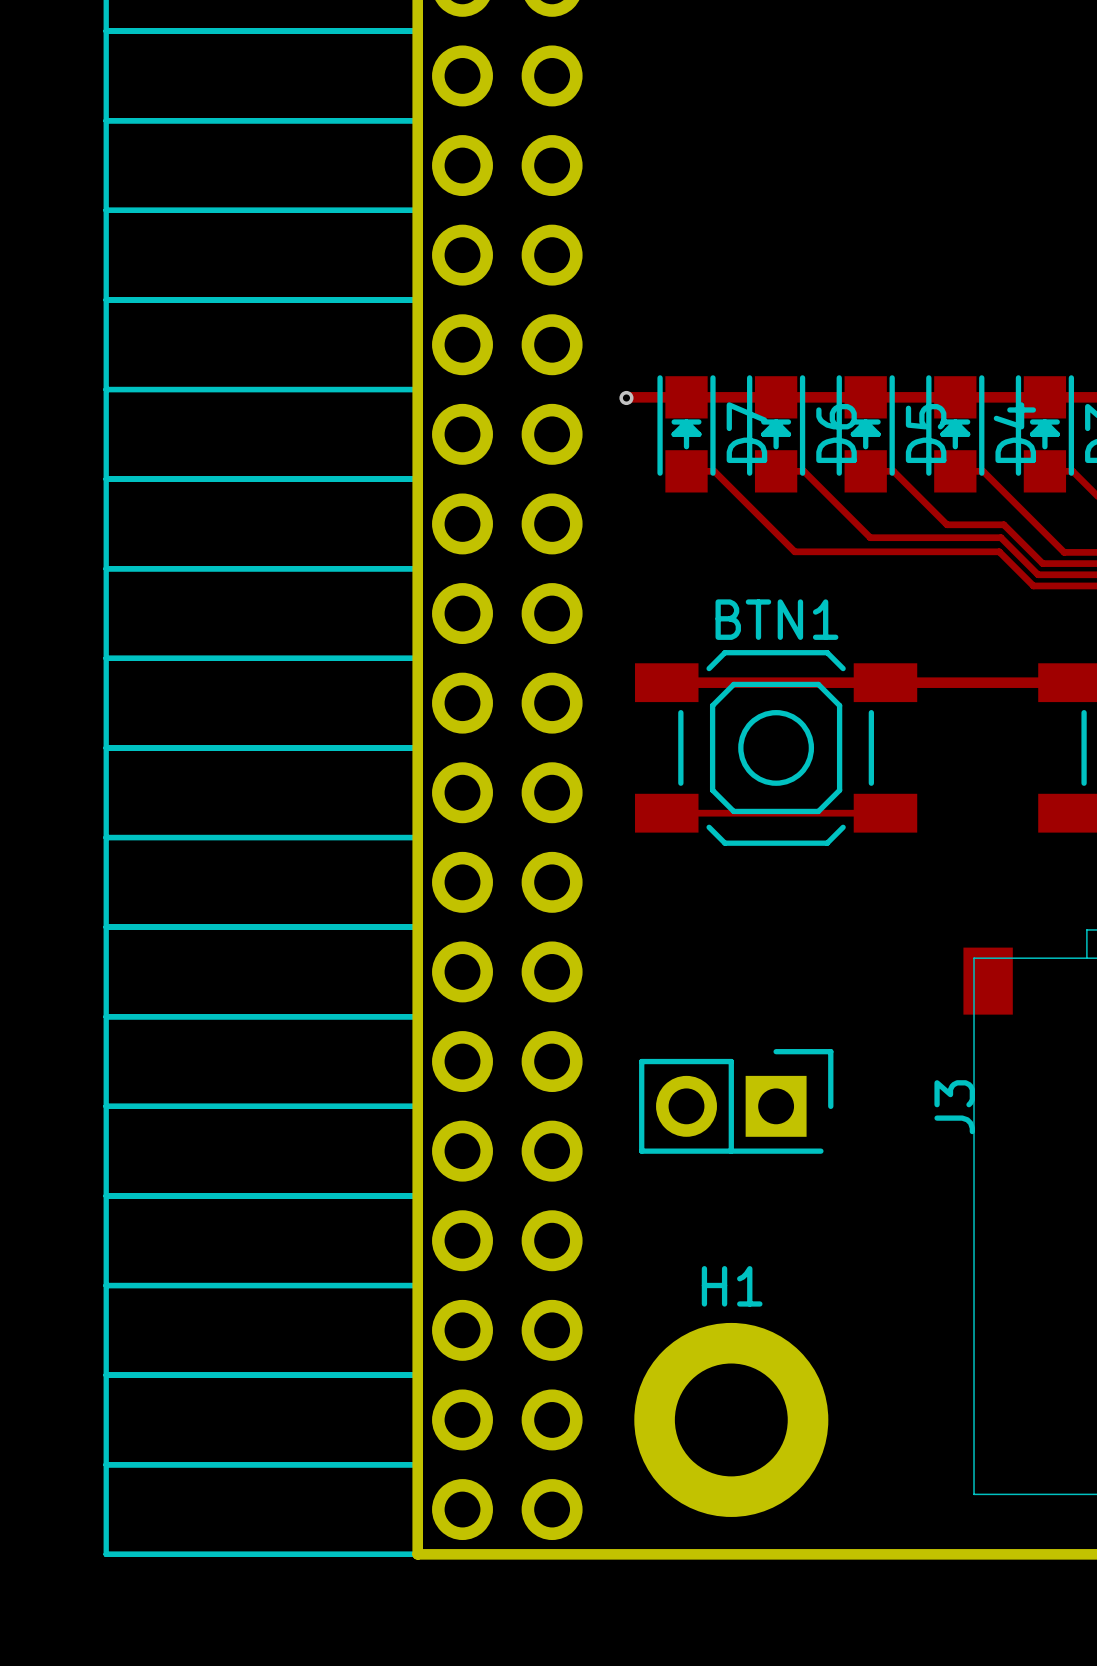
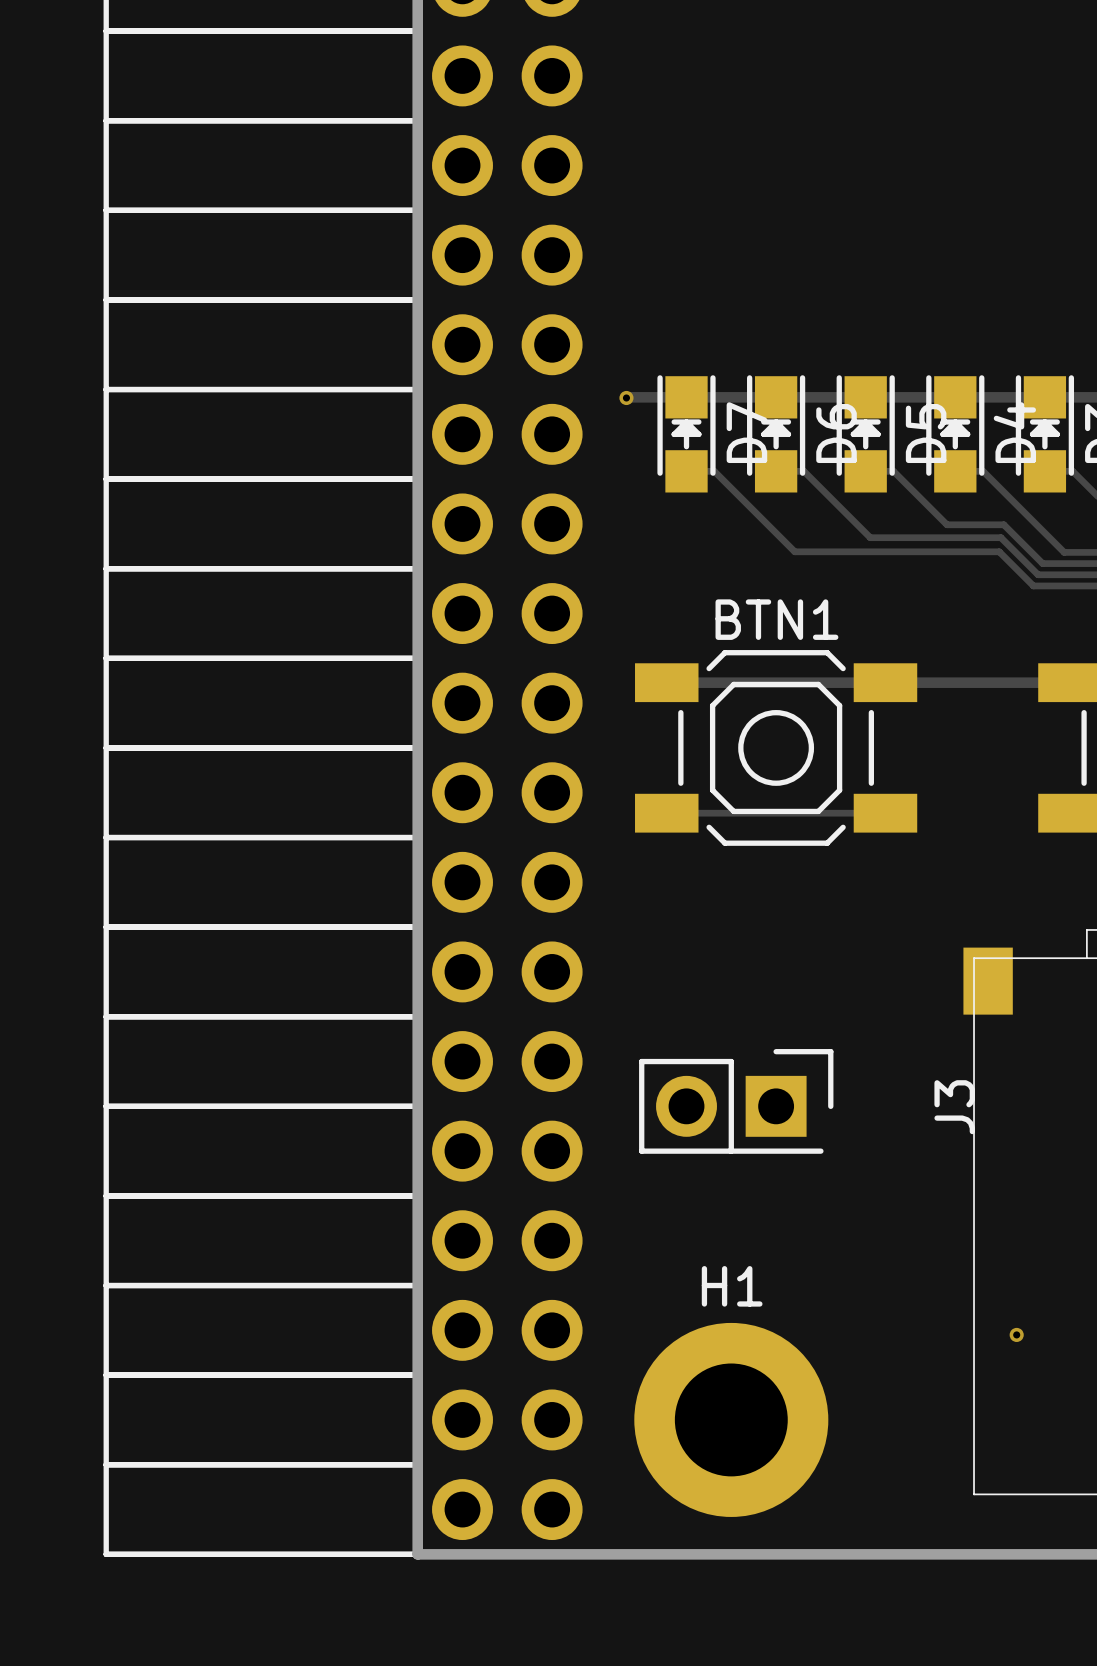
via: none -> (1016, 1334)

